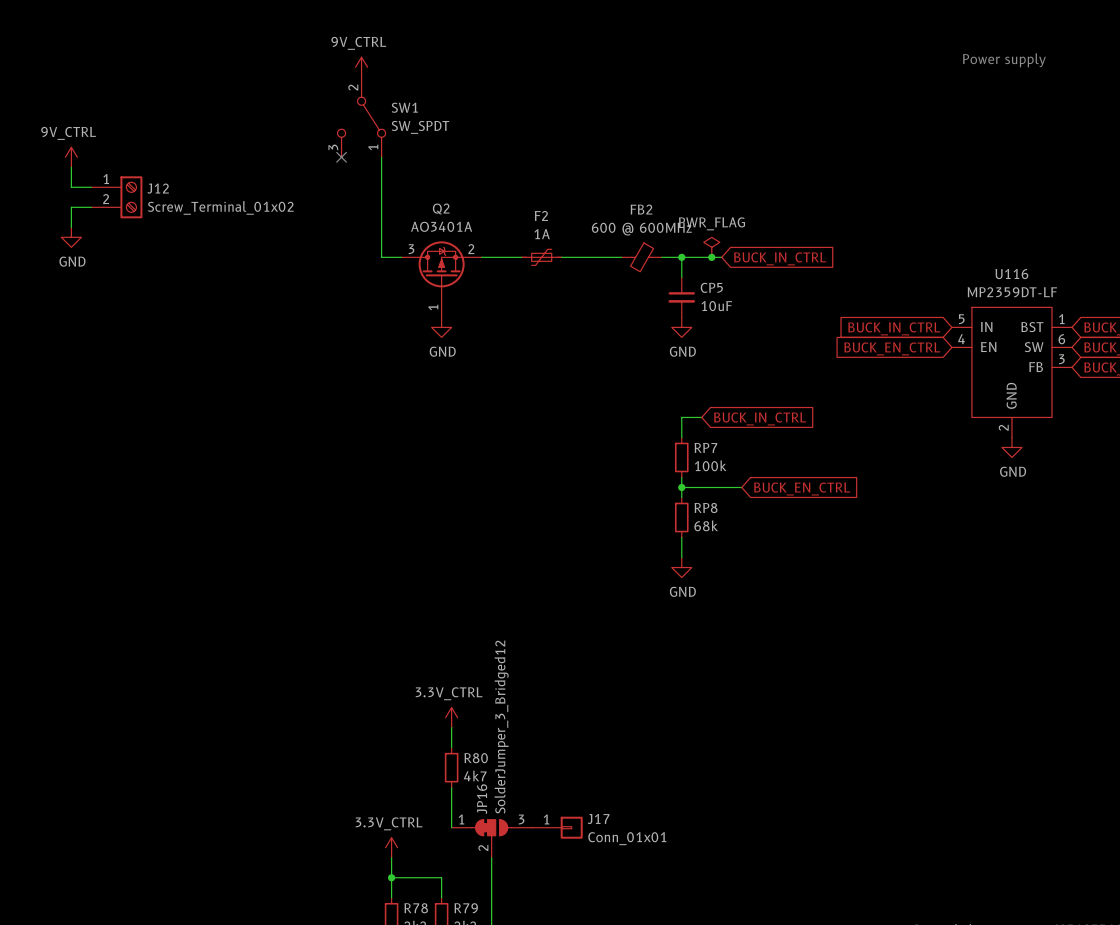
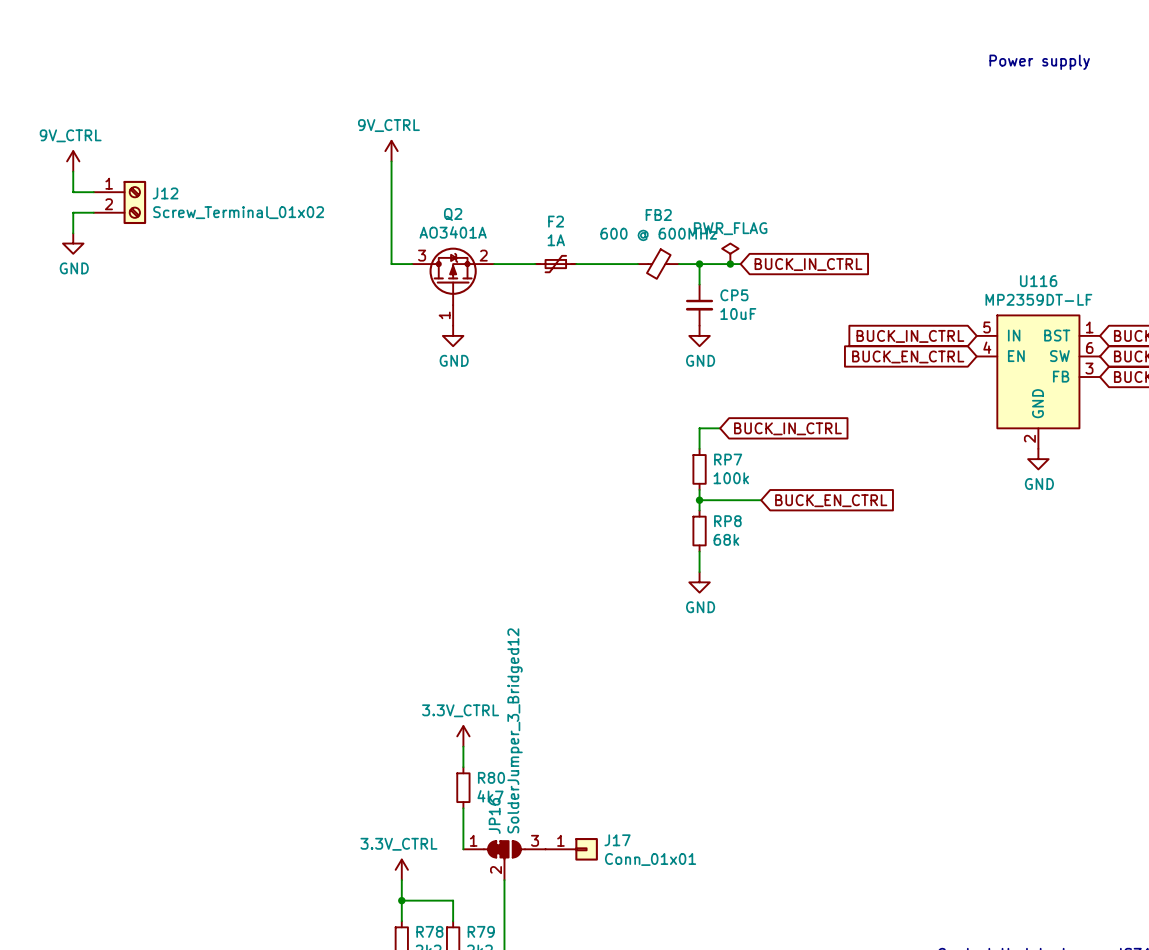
power symbol position: 9V_CTRL (361, 67) -> 9V_CTRL (391, 151)
SW1: SW_SPDT (361, 117) -> none
no-connect mark: (341, 157) -> none

